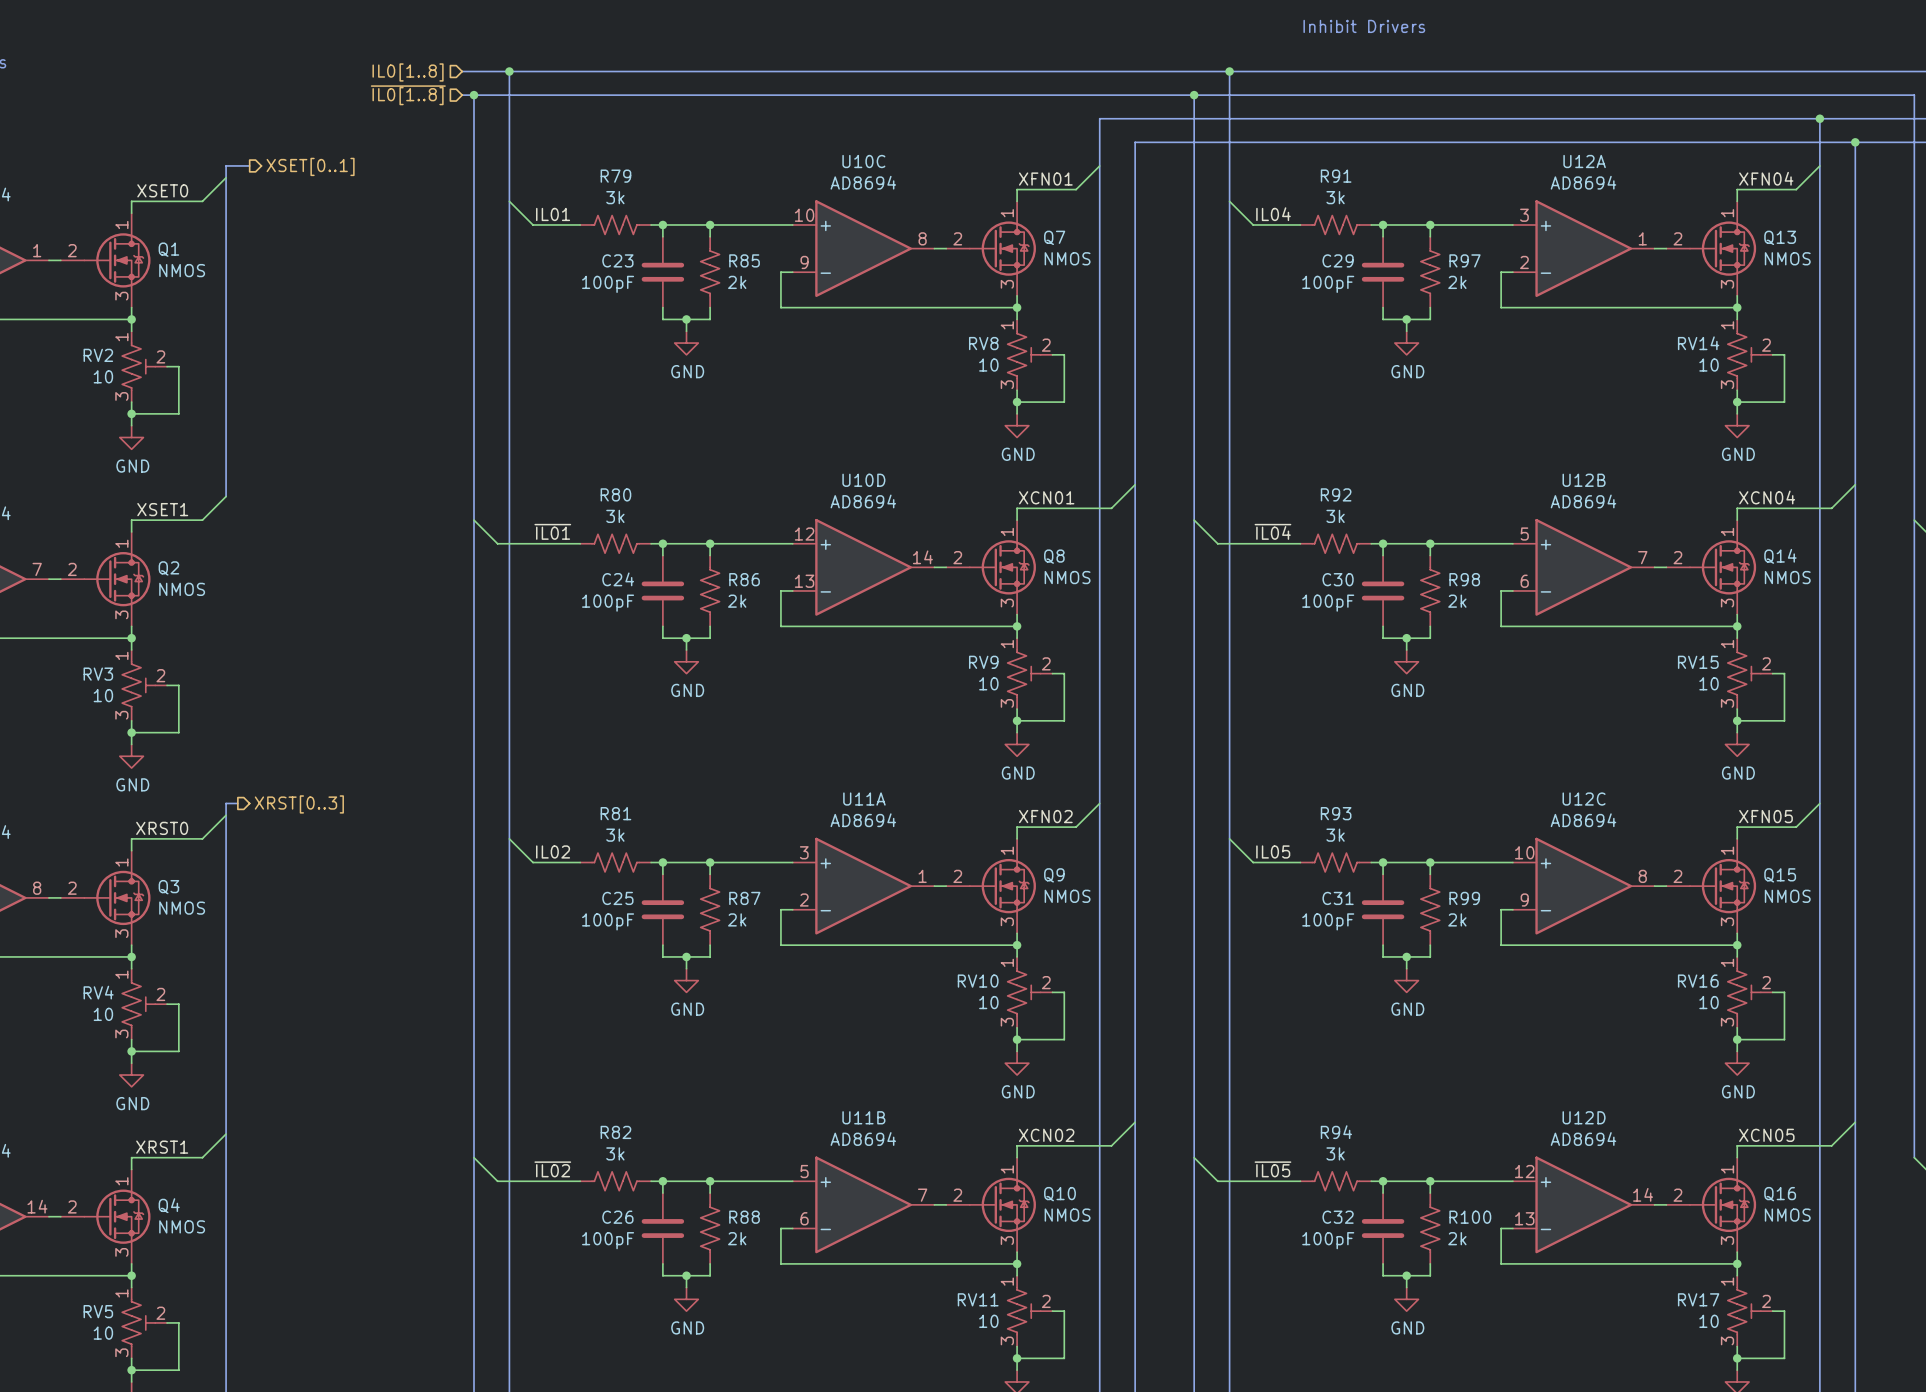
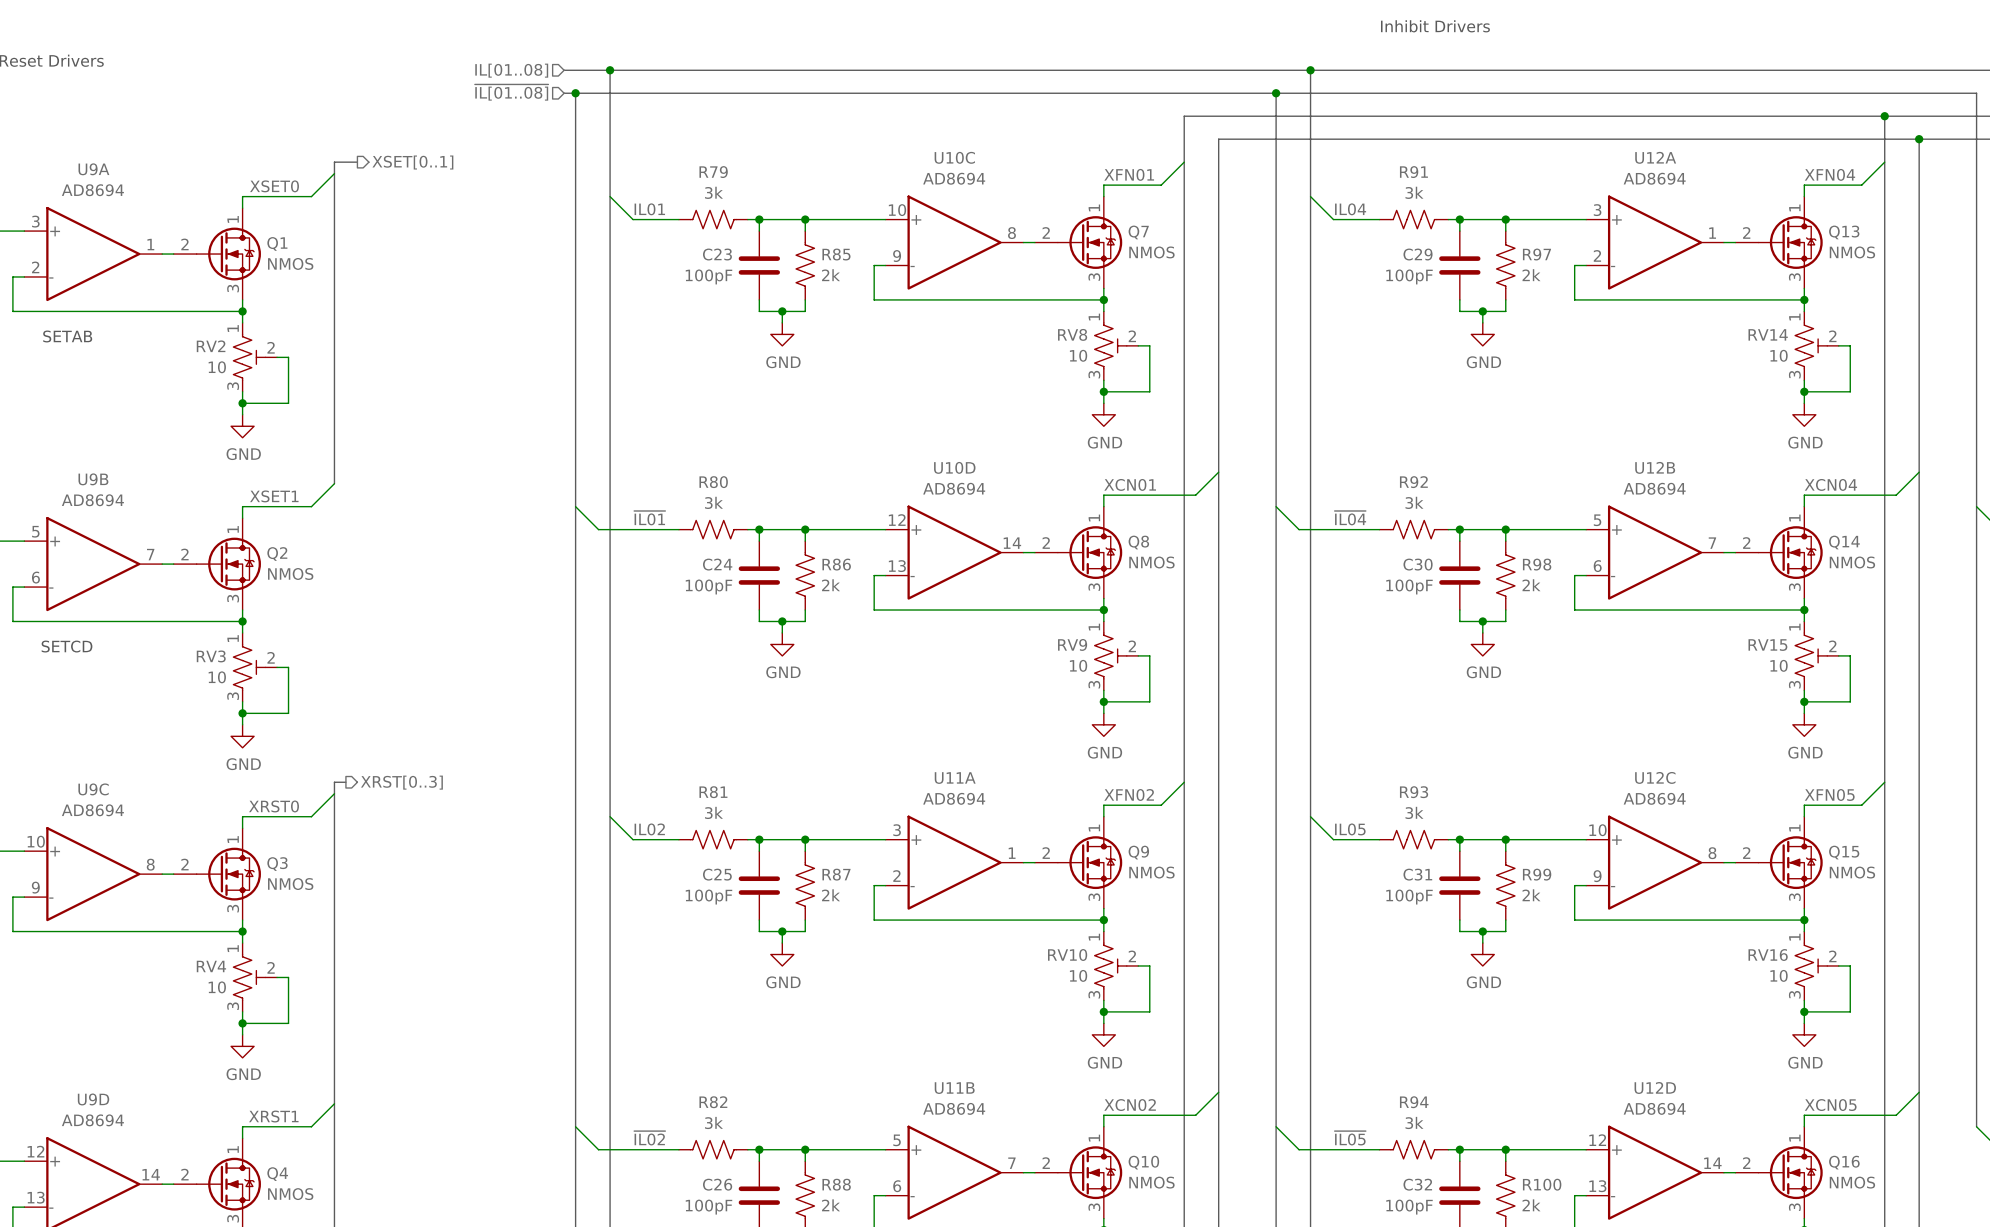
hierarchical label: IL0[1..8] (408, 72) -> IL[01..08] (511, 70)
hierarchical label: ~{IL0[1..8]} (408, 95) -> ~{IL[01..08]} (511, 92)

